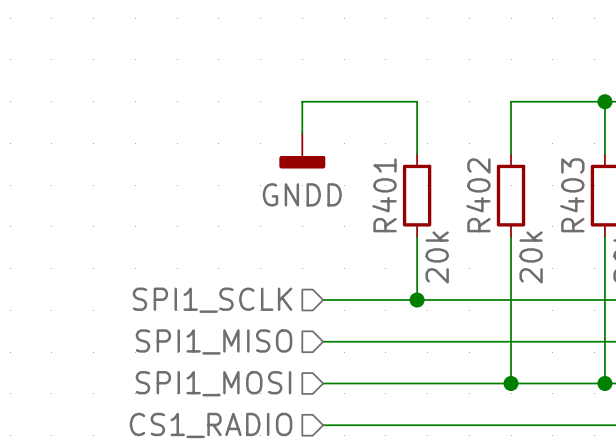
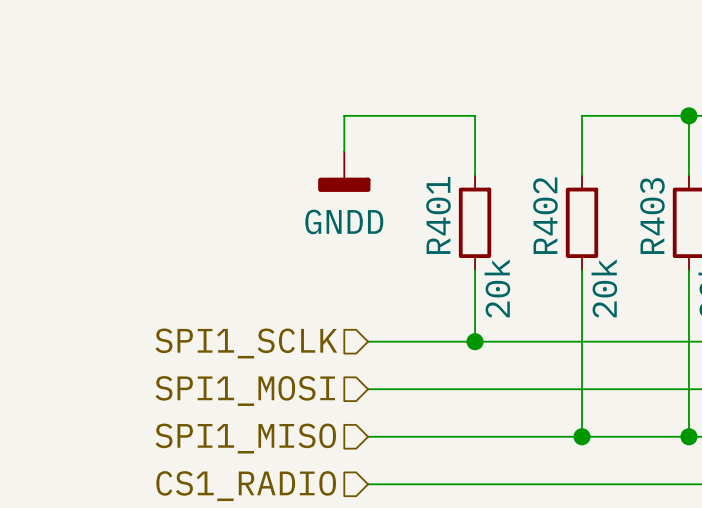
hierarchical label: SPI1_MISO (214, 341) -> SPI1_MOSI (245, 391)
hierarchical label: SPI1_MOSI (213, 383) -> SPI1_MISO (245, 438)

